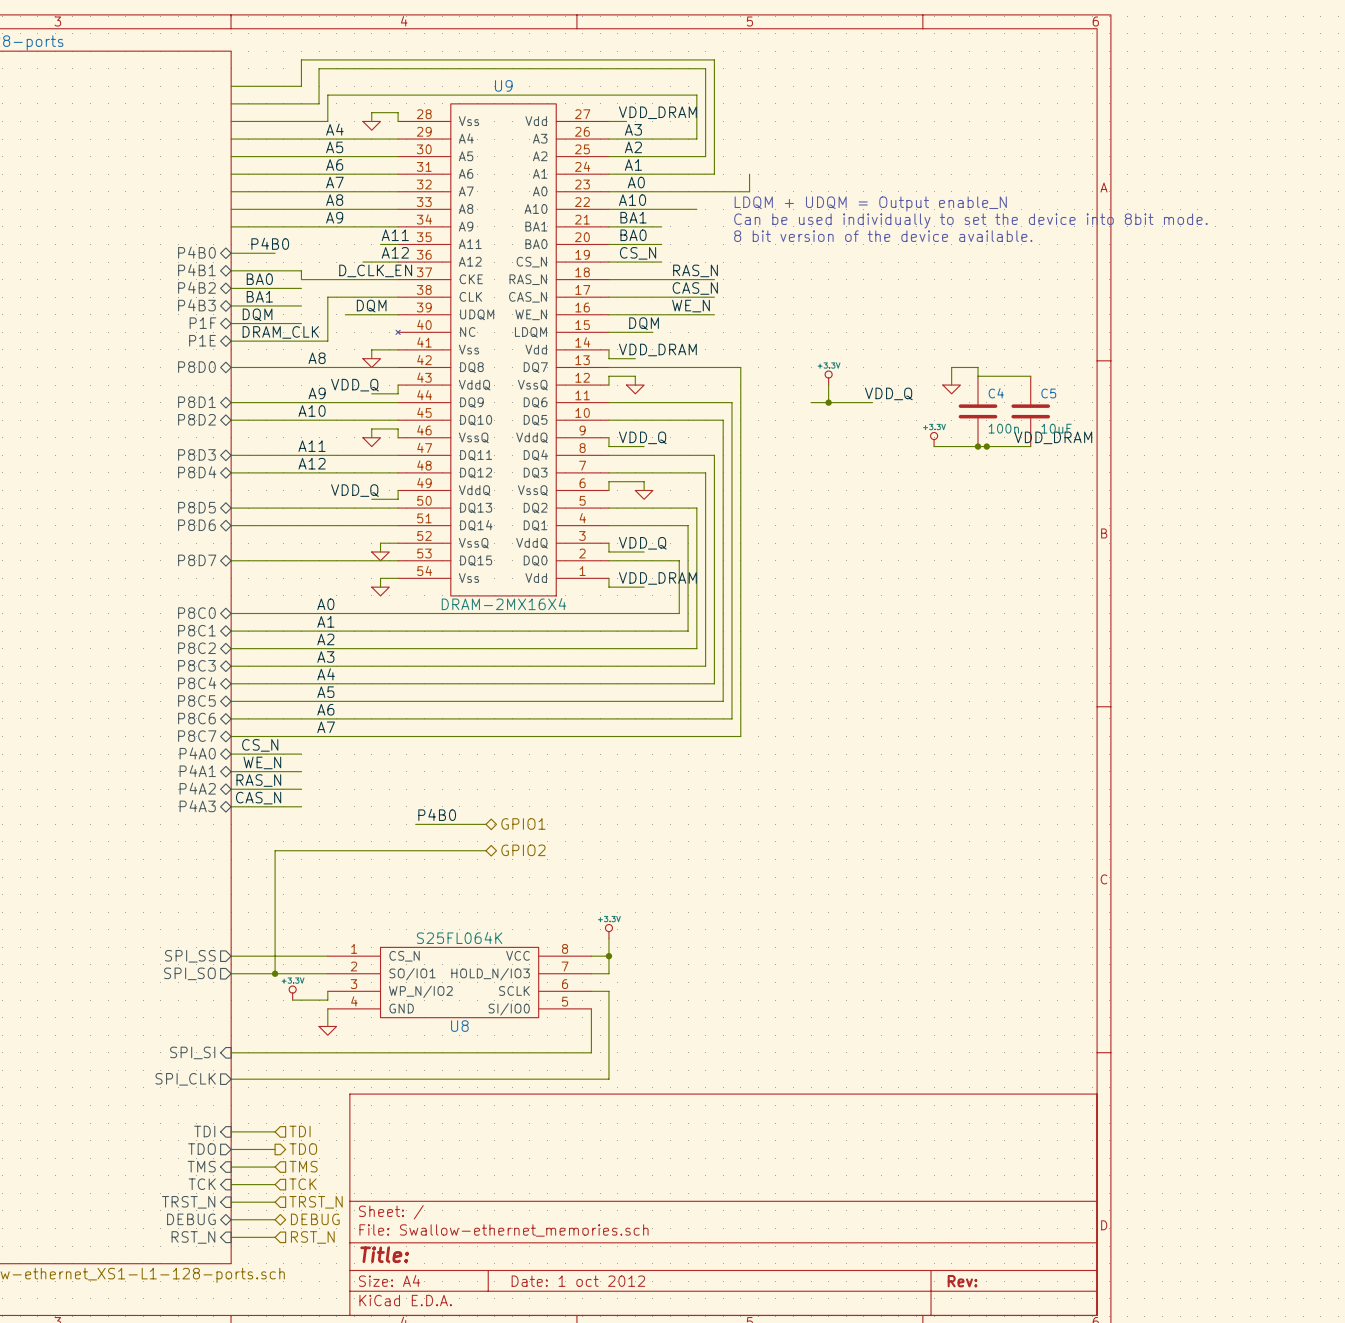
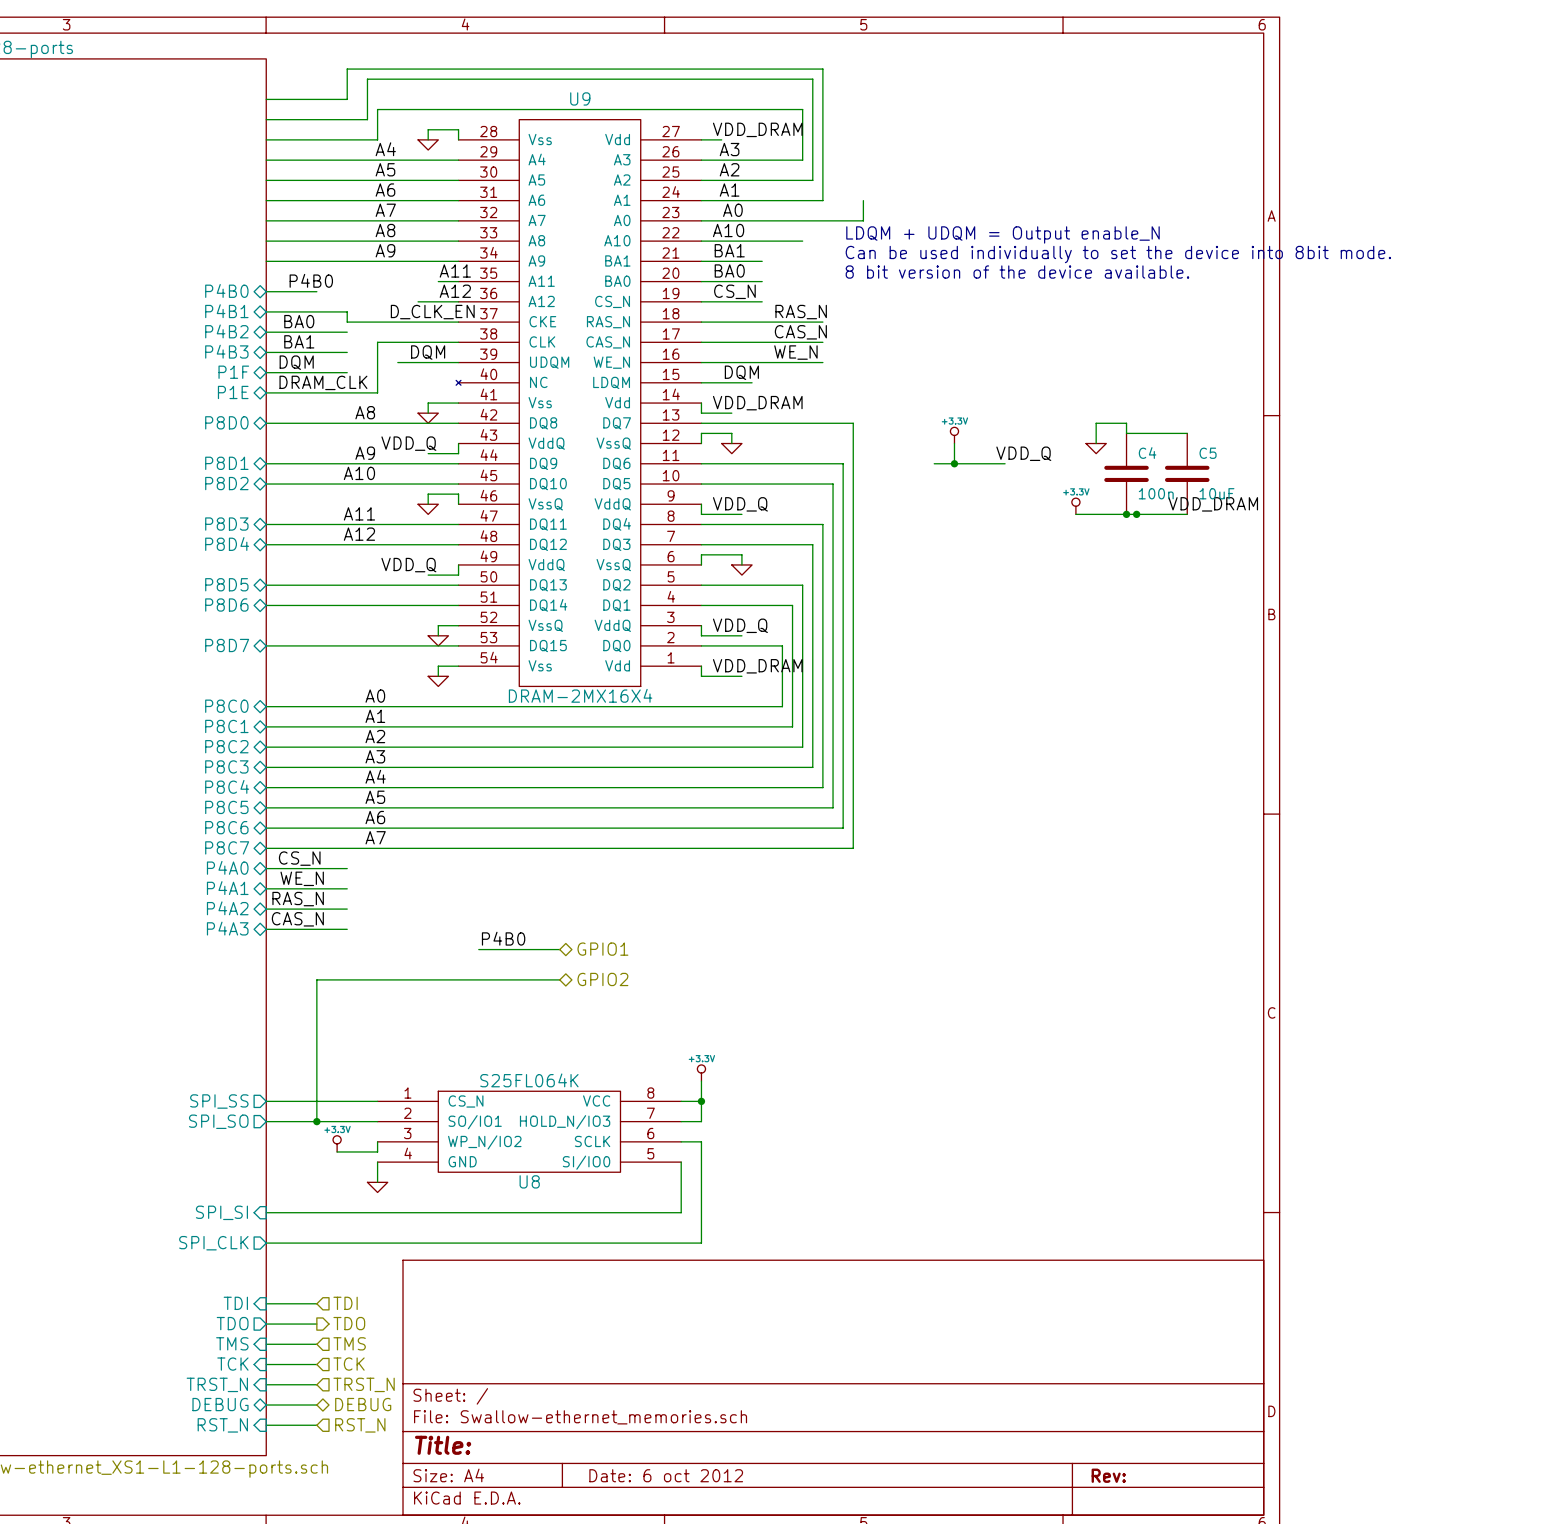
title block: Date: 1 oct 2012 (578, 1281) -> Date: 6 oct 2012 (666, 1475)

